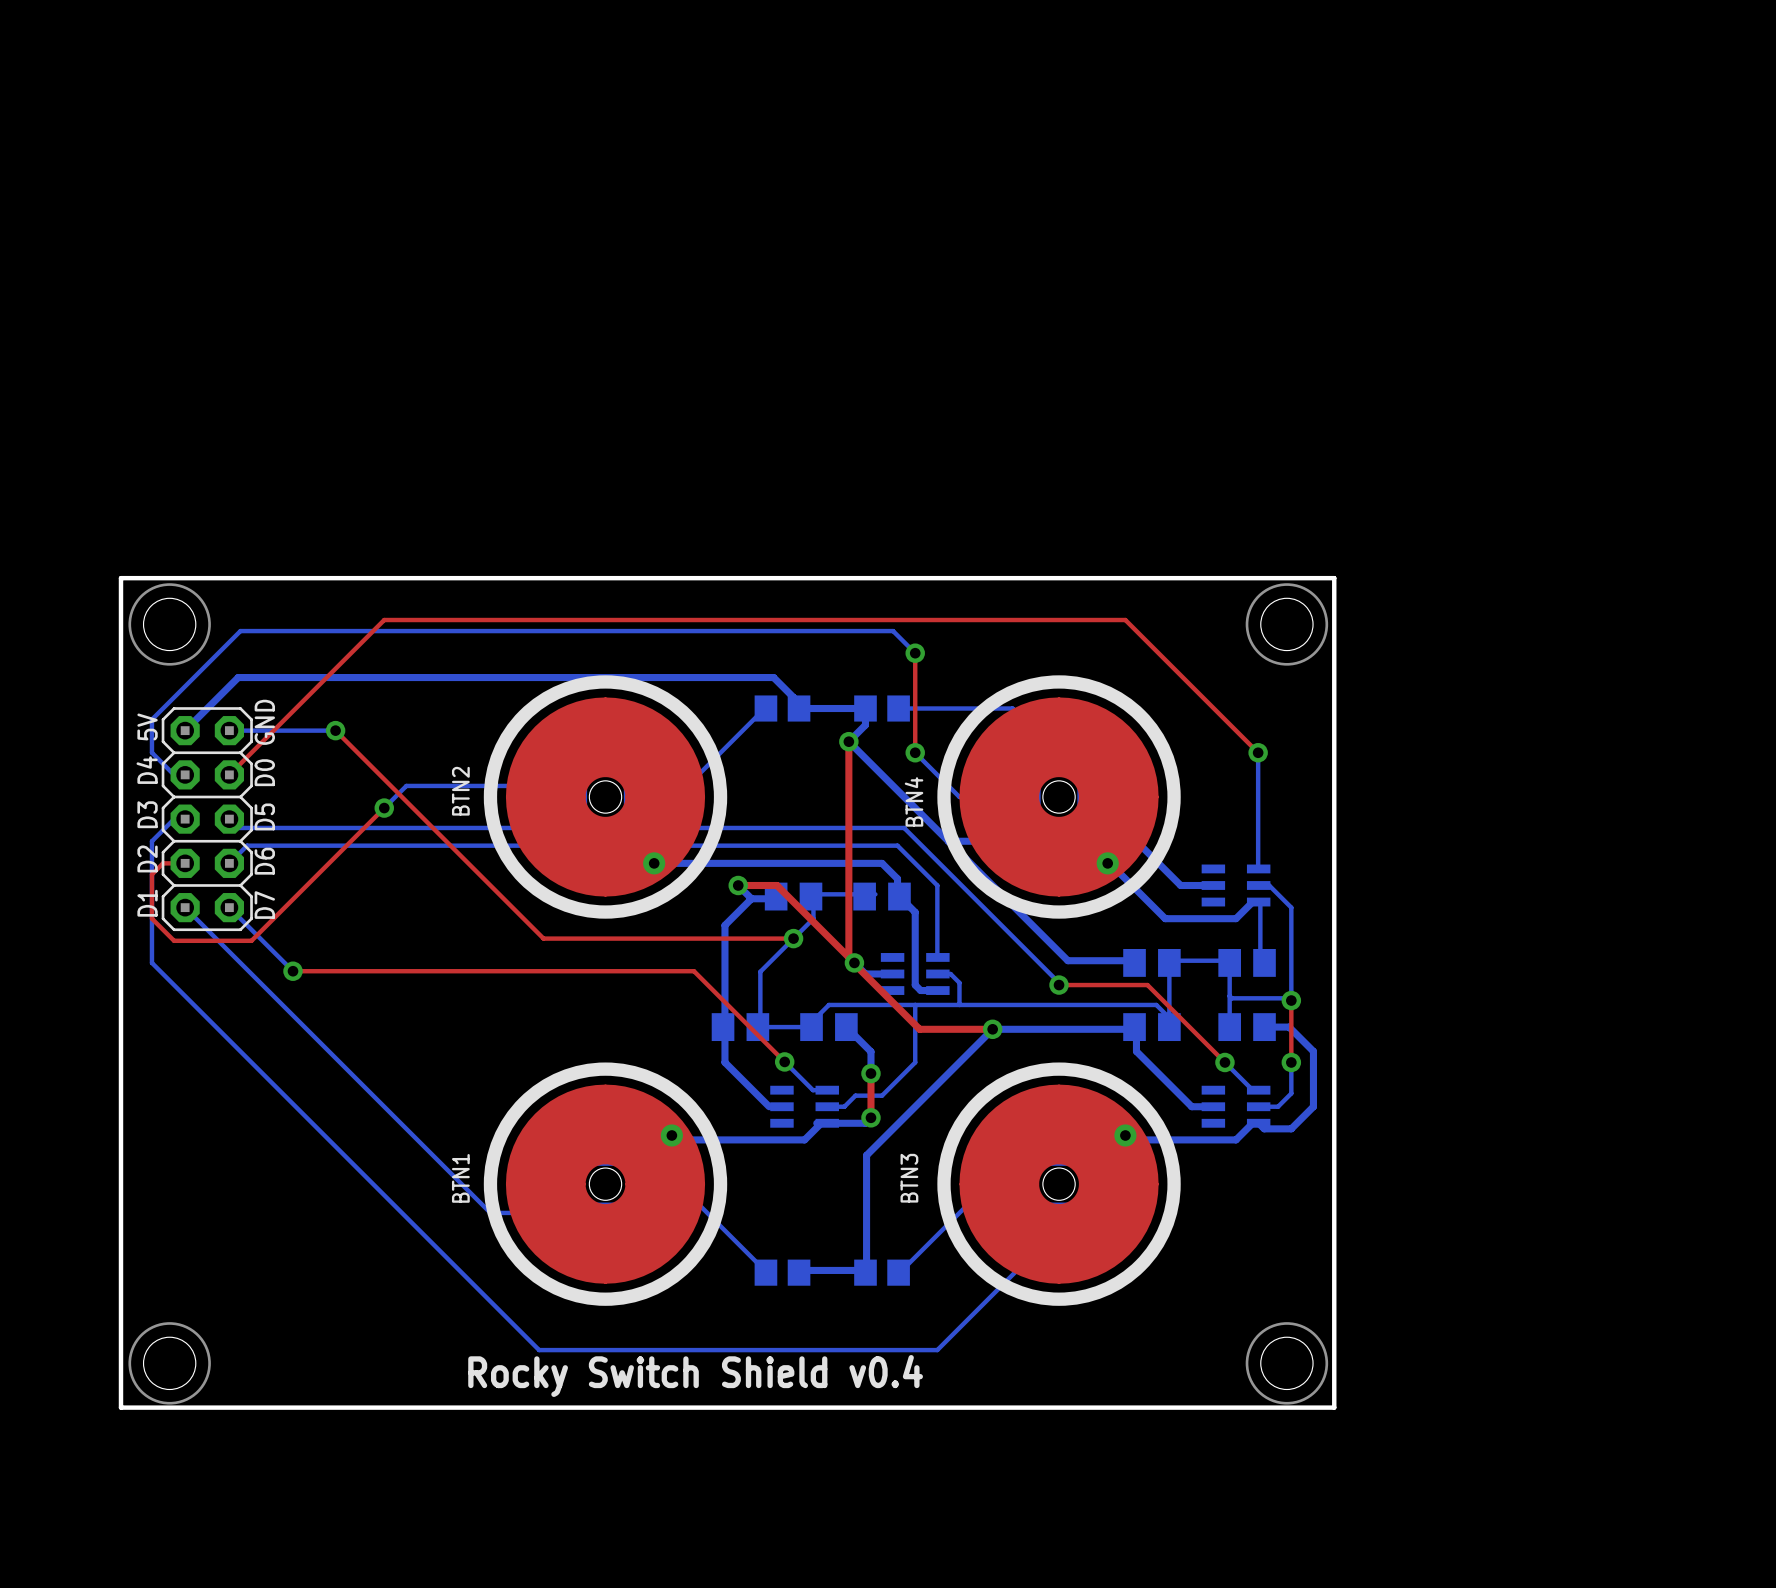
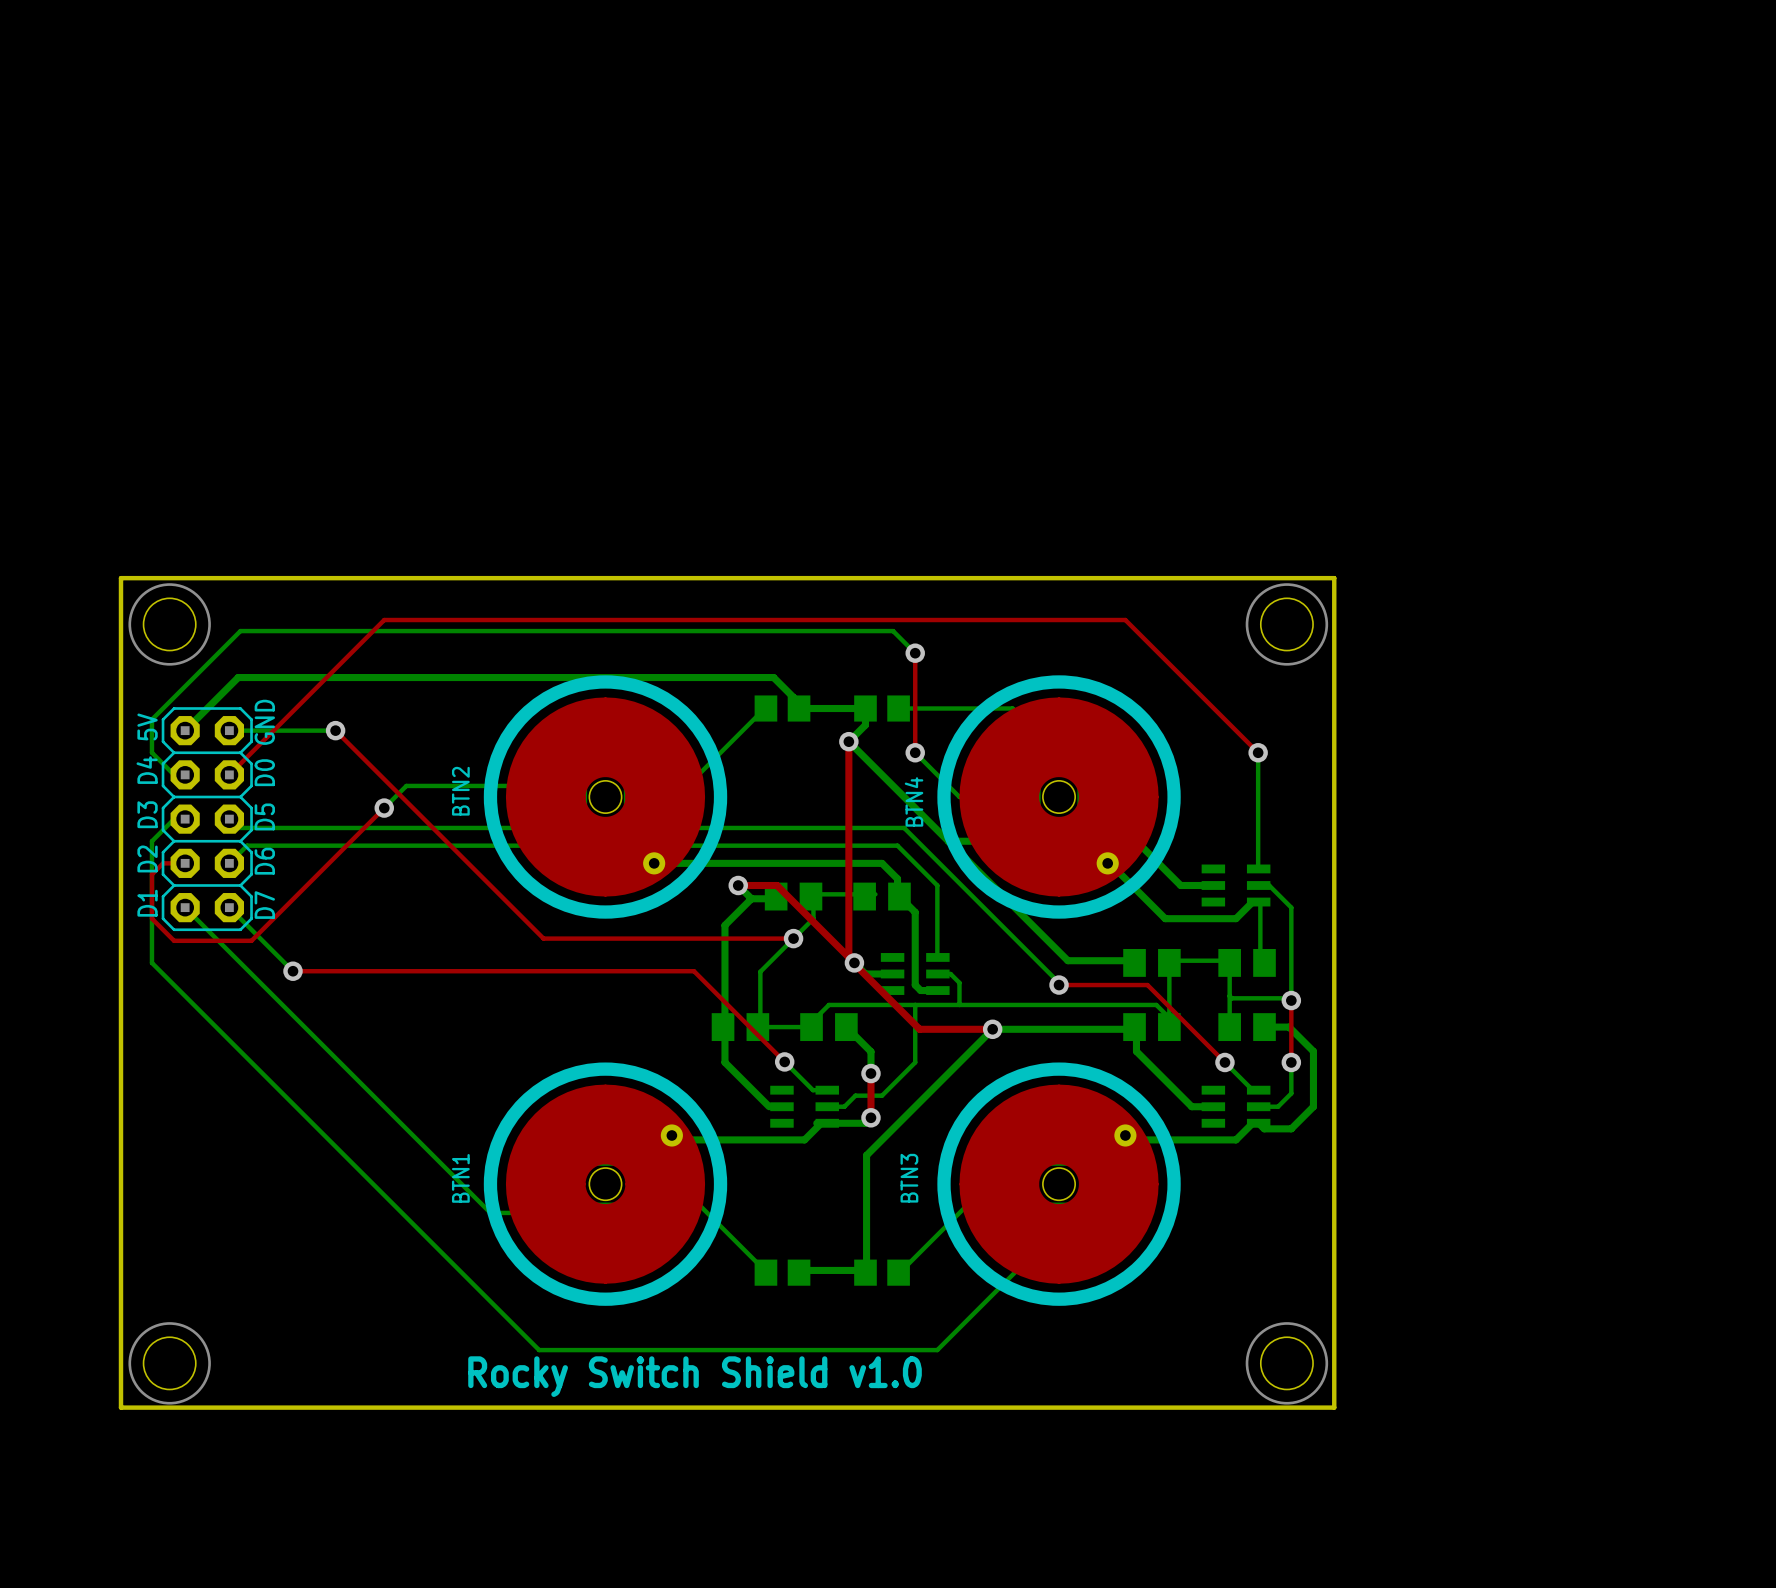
text: Rocky Switch Shield v0.4 (695, 1376) -> Rocky Switch Shield v1.0 (695, 1376)

